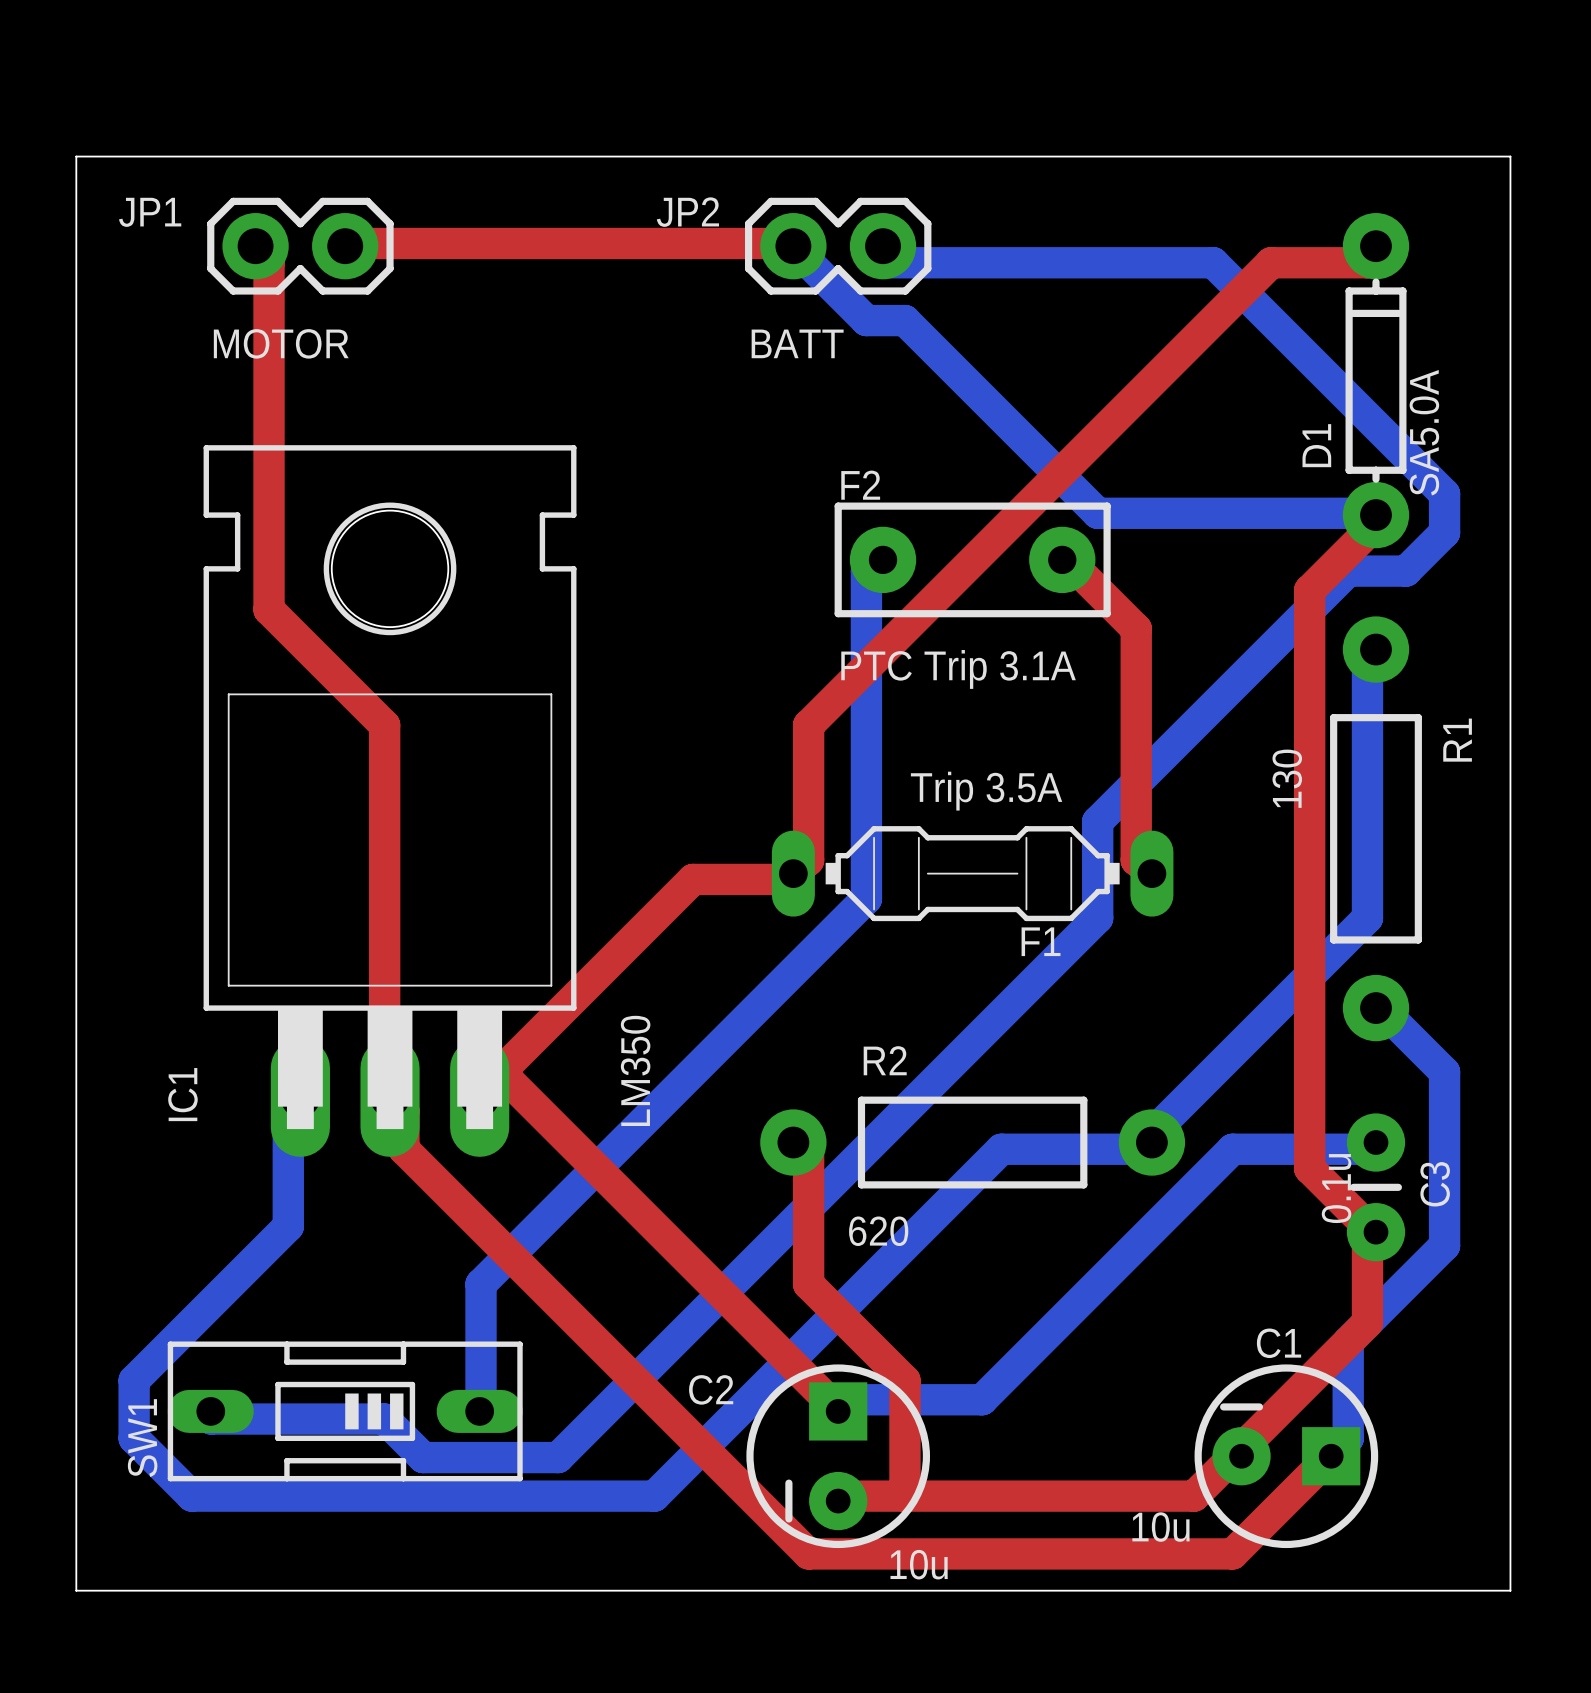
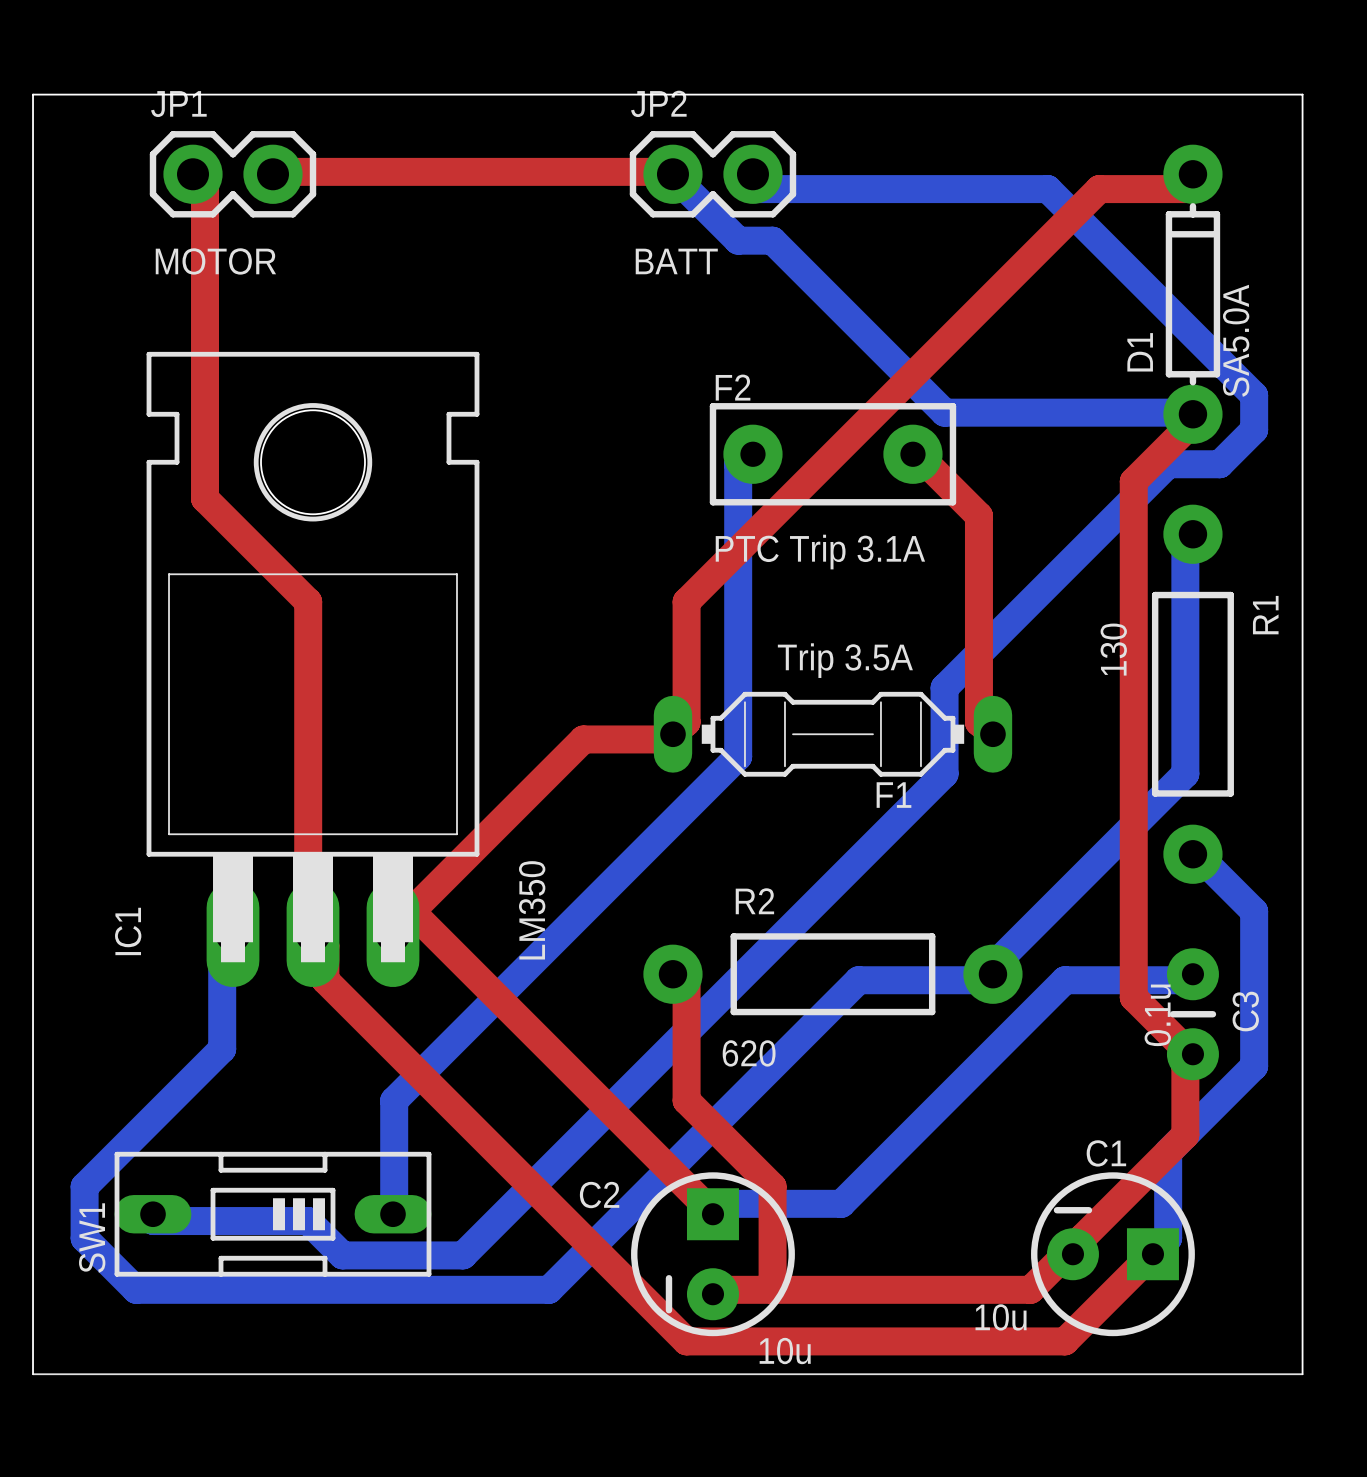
board edge: (76, 156) (1510, 156) (1510, 1590) (76, 1590) -> (33, 94) (1302, 94) (1302, 1374)
JP1 name position: JP1 (150, 212) -> JP1 (178, 104)
JP2 name position: JP2 (687, 212) -> JP2 (658, 103)
line: none -> (33, 1374) (1302, 1374)

